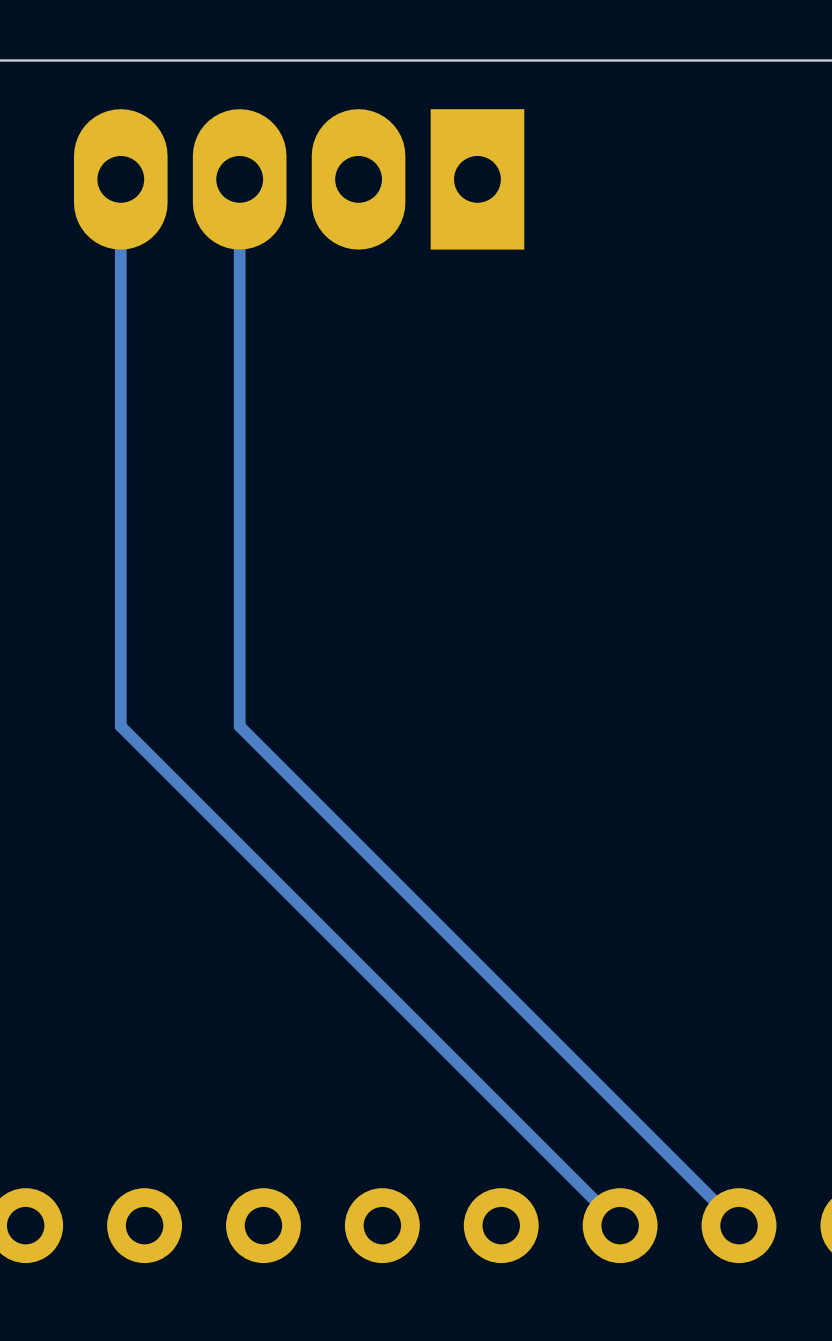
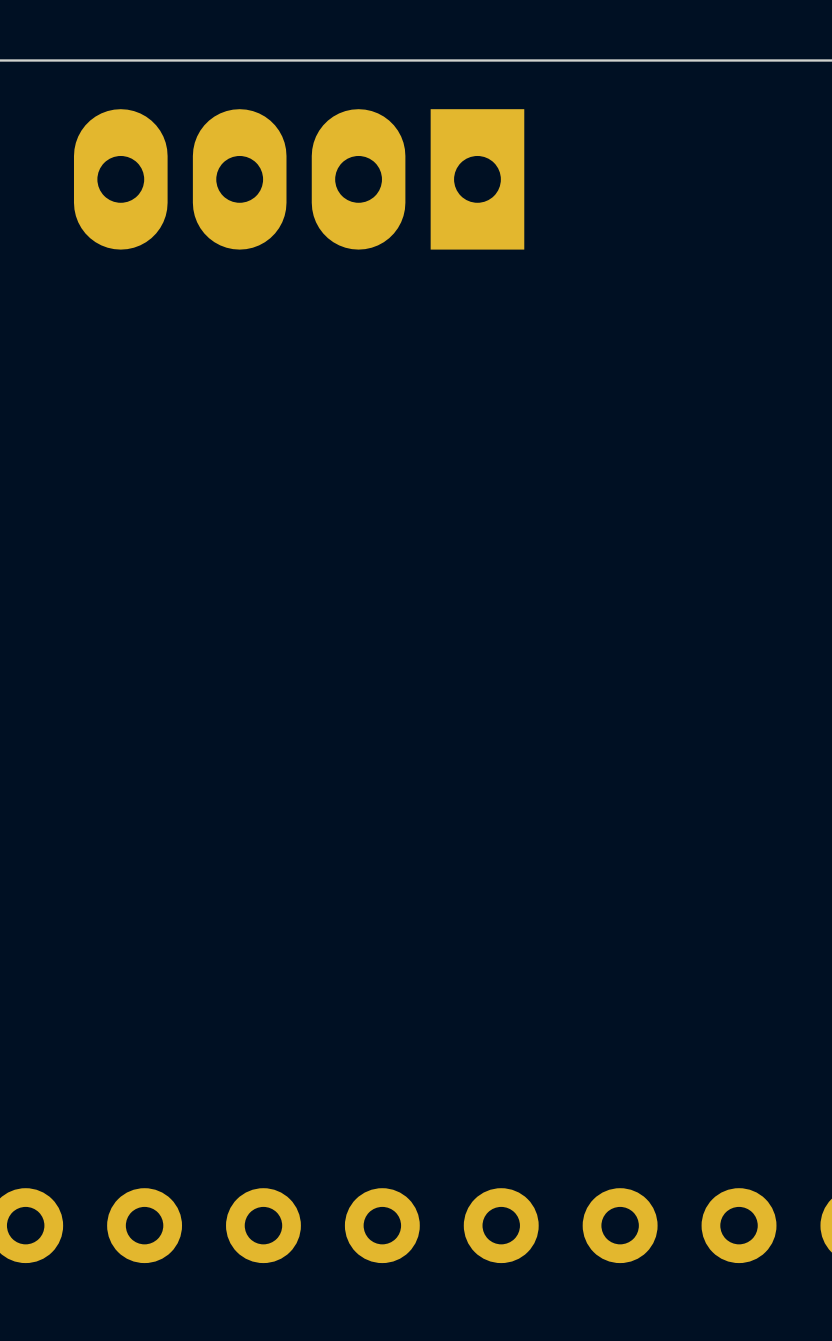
track: (120, 179) (120, 726) (620, 1225) -> none
track: (239, 179) (239, 726) (739, 1225) -> none

